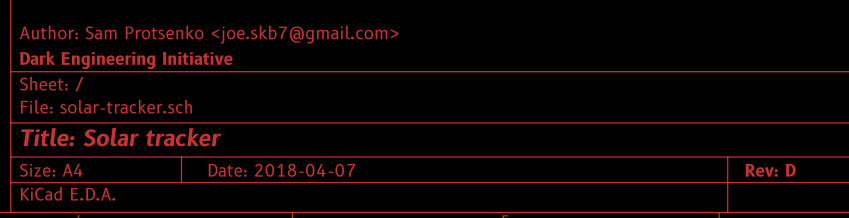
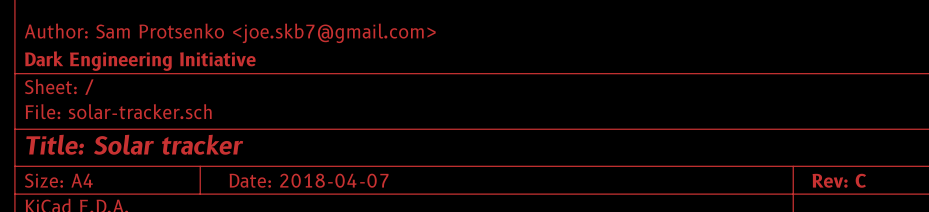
title block: Rev: D (770, 170) -> Rev: C (839, 180)

